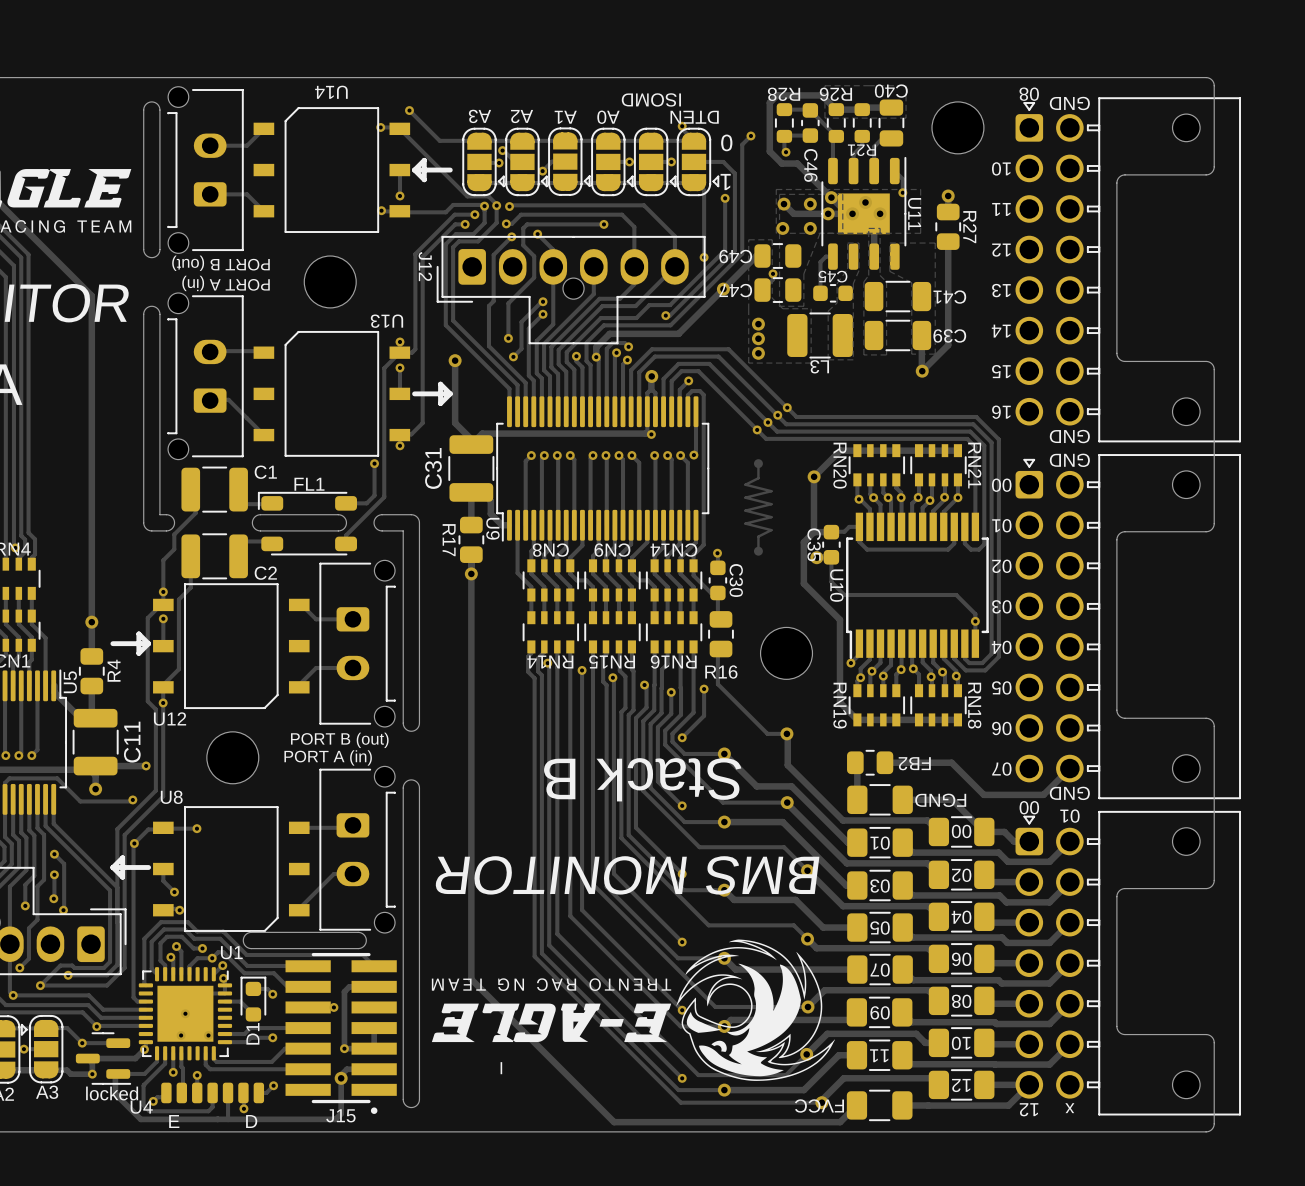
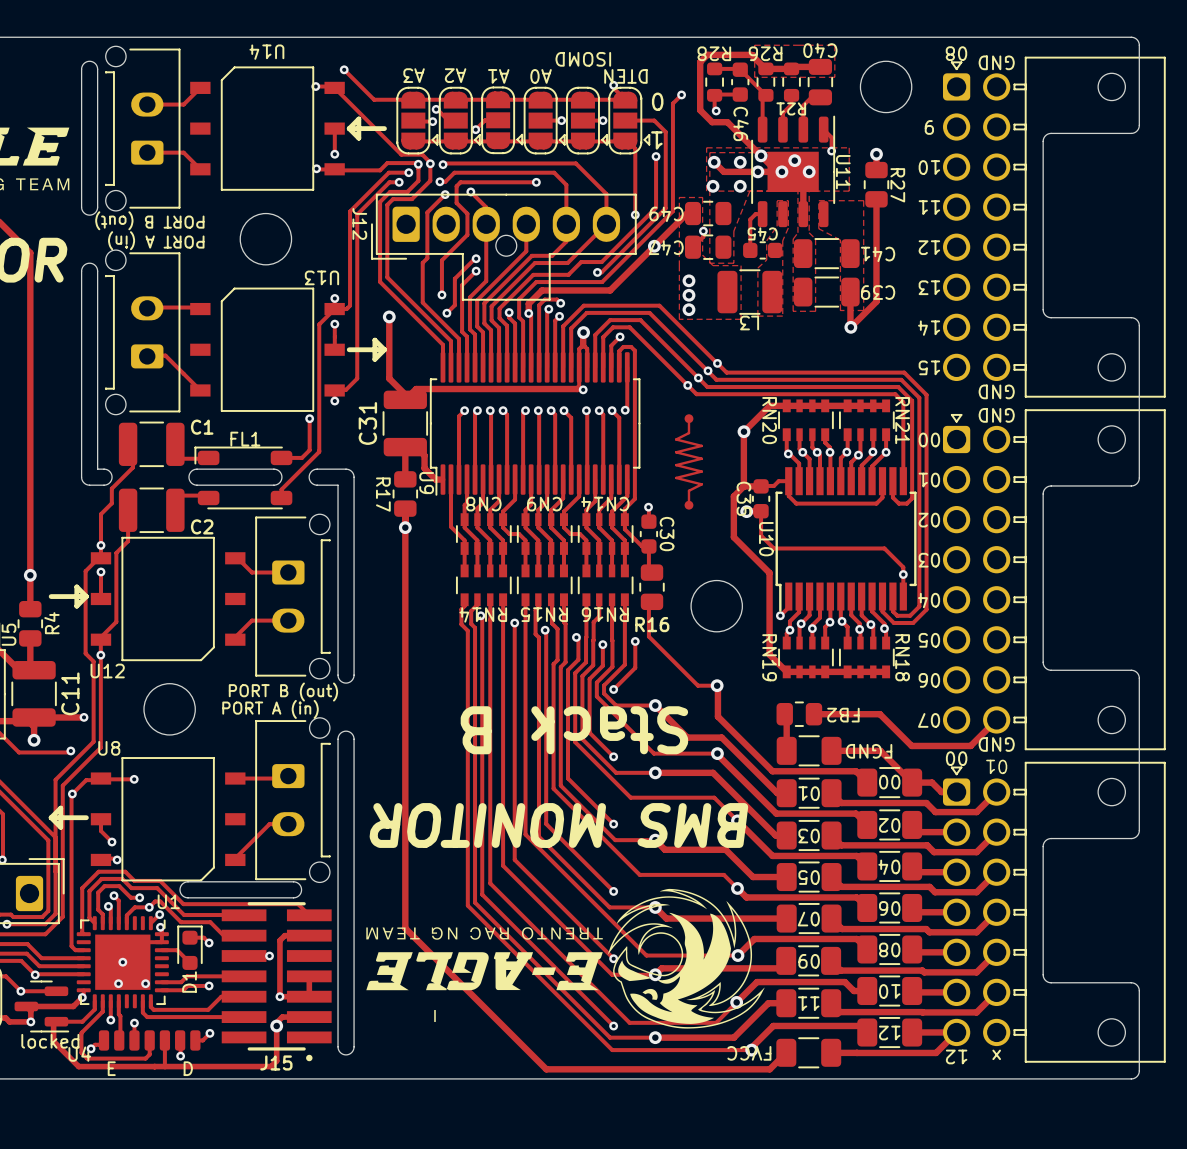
text: 10 (1001, 168) -> 9 (929, 127)
text: 11 (1001, 209) -> 10 (929, 167)
text: 12 (1001, 250) -> 11 (929, 207)
text: 13 (1001, 290) -> 12 (929, 247)
text: 14 (1001, 331) -> 13 (929, 287)
text: 15 (1001, 371) -> 14 (929, 328)
text: 16 (1001, 412) -> 15 (929, 367)

